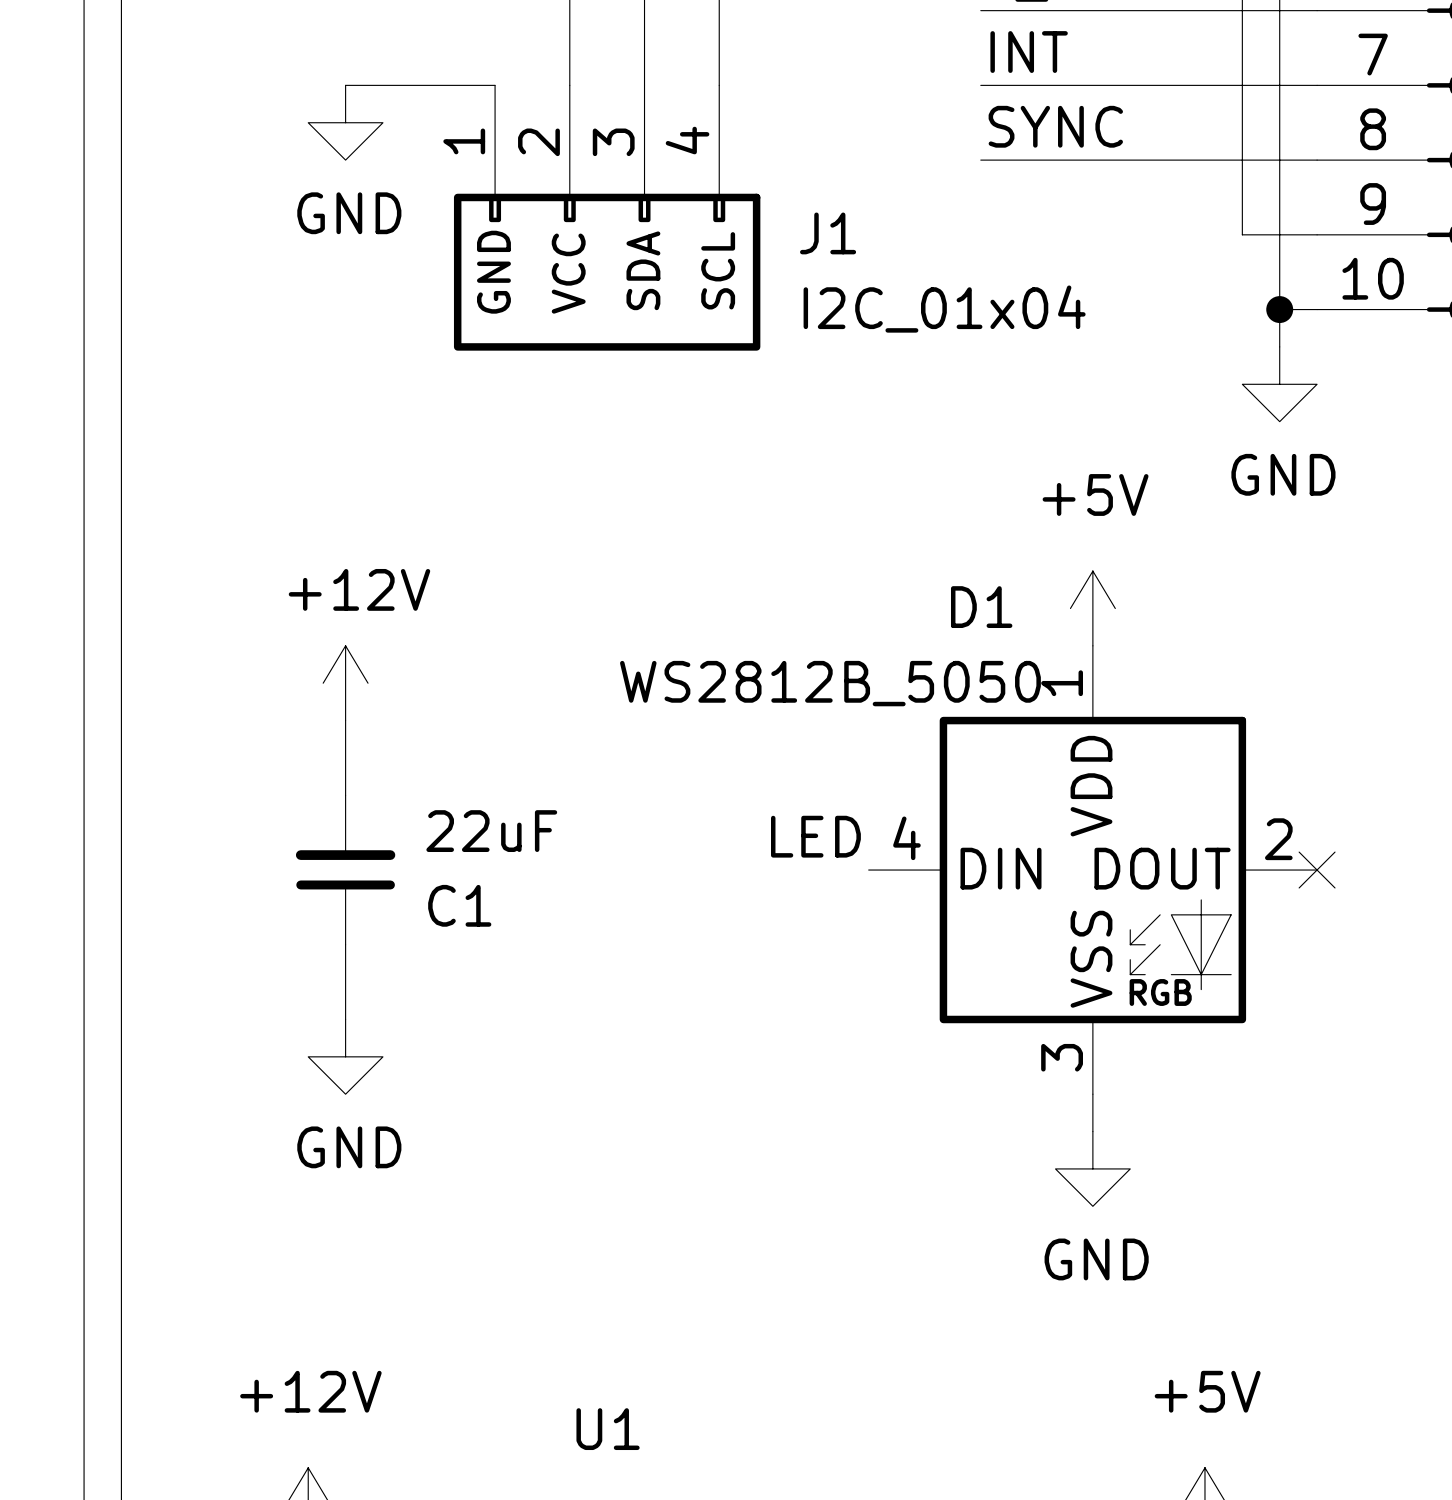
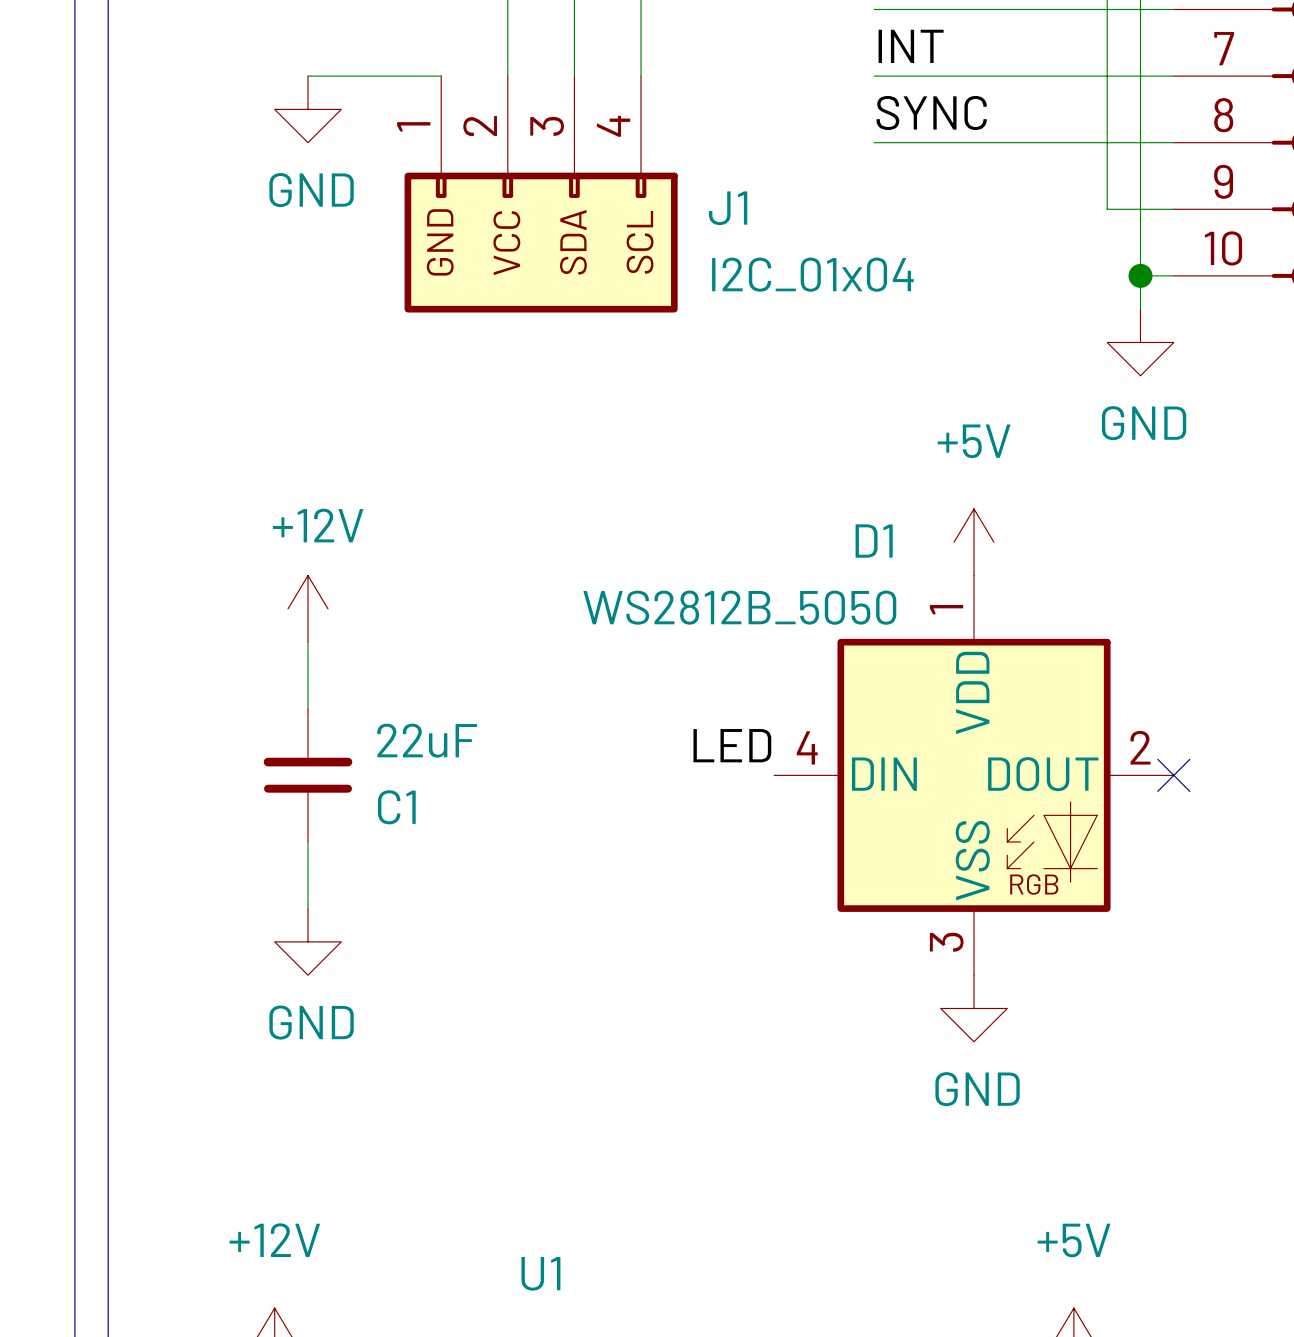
power symbol position: GND (1092, 1168) -> GND (974, 1008)

